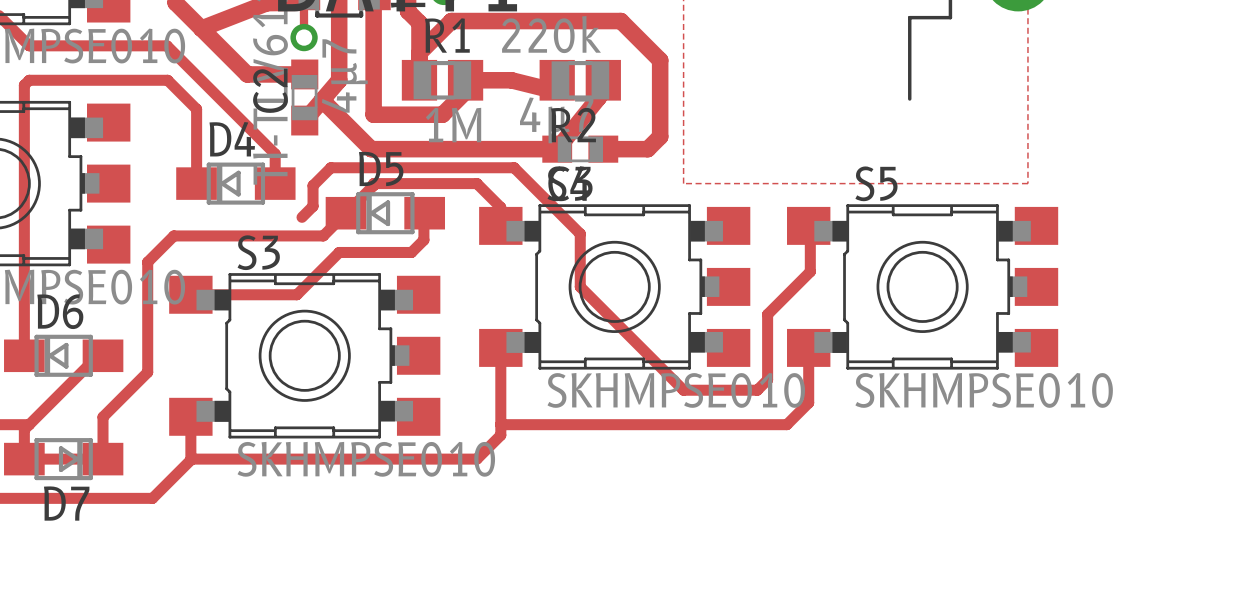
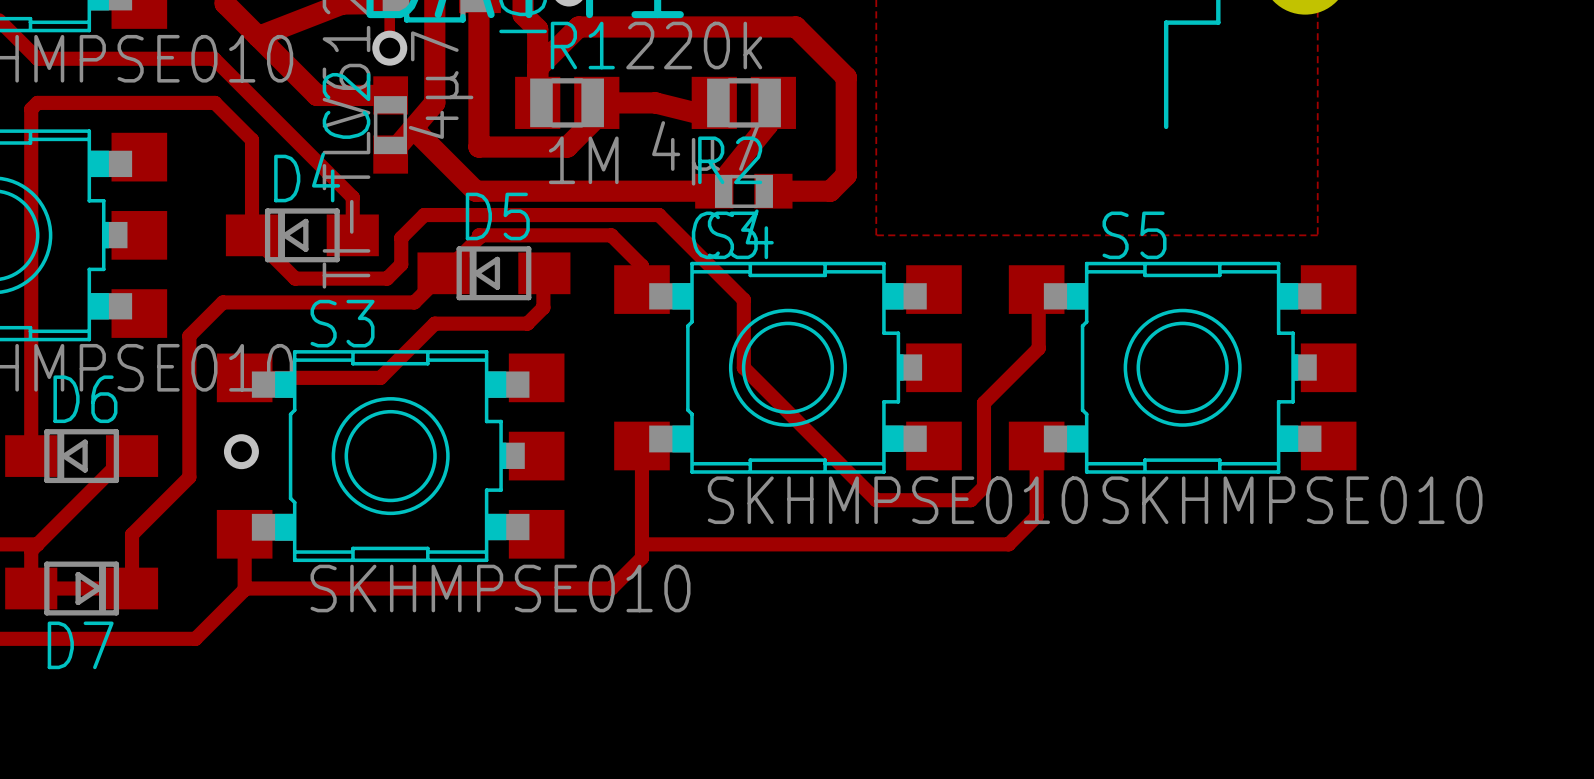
track: none -> (251, 235) (295, 278) (387, 278)
via: none -> (241, 451)

